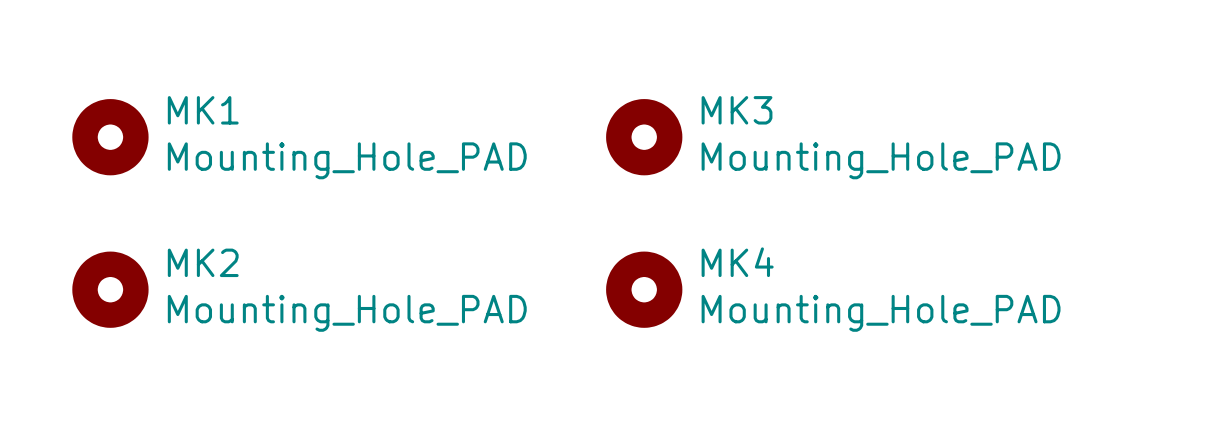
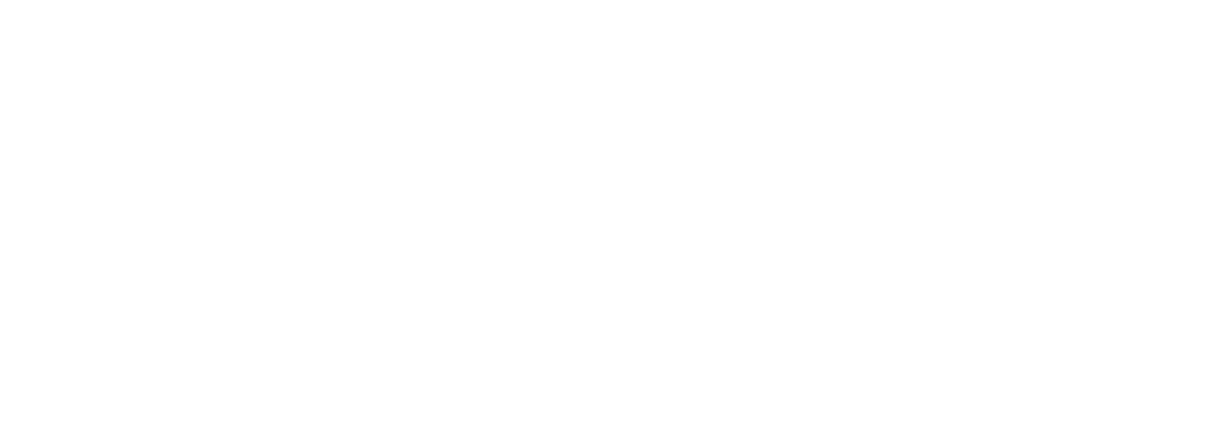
MK1: Mounting_Hole_PAD (110, 137) -> none
MK3: Mounting_Hole_PAD (644, 137) -> none
MK2: Mounting_Hole_PAD (110, 289) -> none
MK4: Mounting_Hole_PAD (644, 289) -> none

